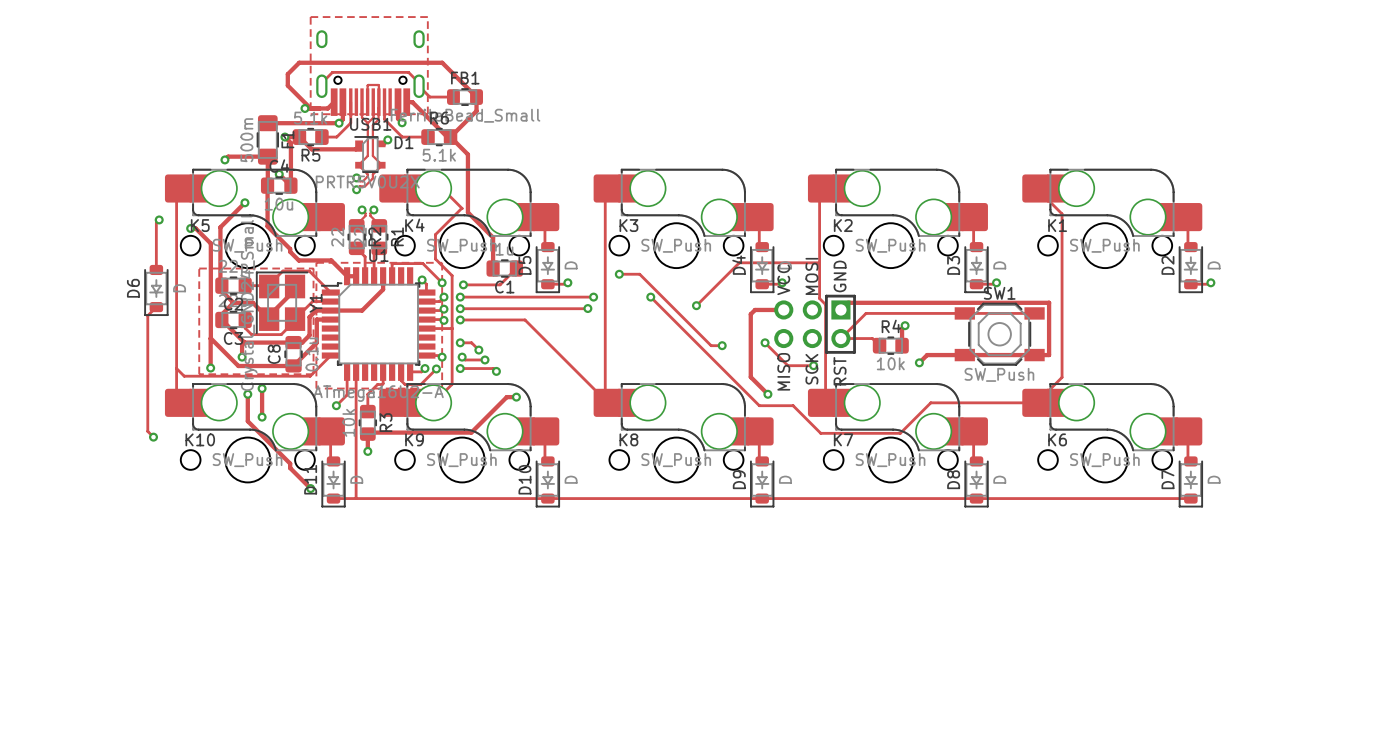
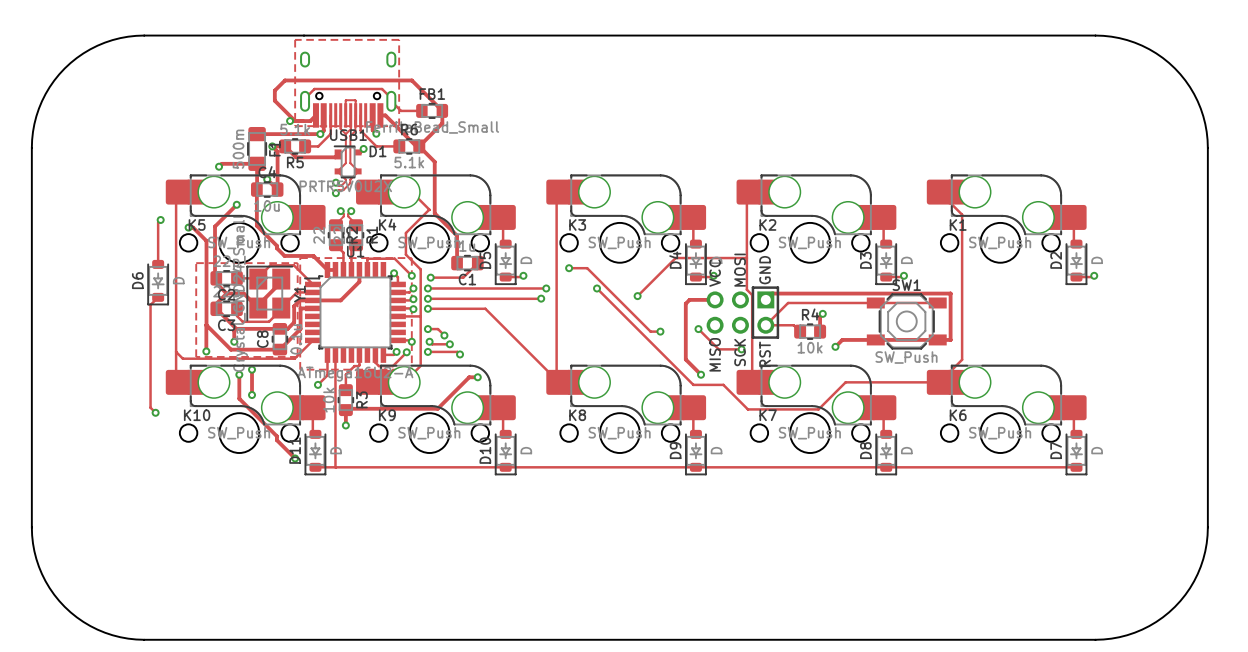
board edge: none -> (144, 35) (1095, 35) (1119, 38) (1149, 49) (1174, 68) (1190, 87) (1200, 108) (1207, 139) (1207, 527) (1205, 551) (1194, 581) (1174, 606) (1156, 621) (1134, 632) (1103, 639) (144, 639) (120, 637) (90, 626) (70, 612) (54, 594) (42, 574) (32, 543) (32, 139) (34, 124) (42, 101) (54, 80) (64, 68) (83, 53) (104, 42) (128, 36) (144, 35)

